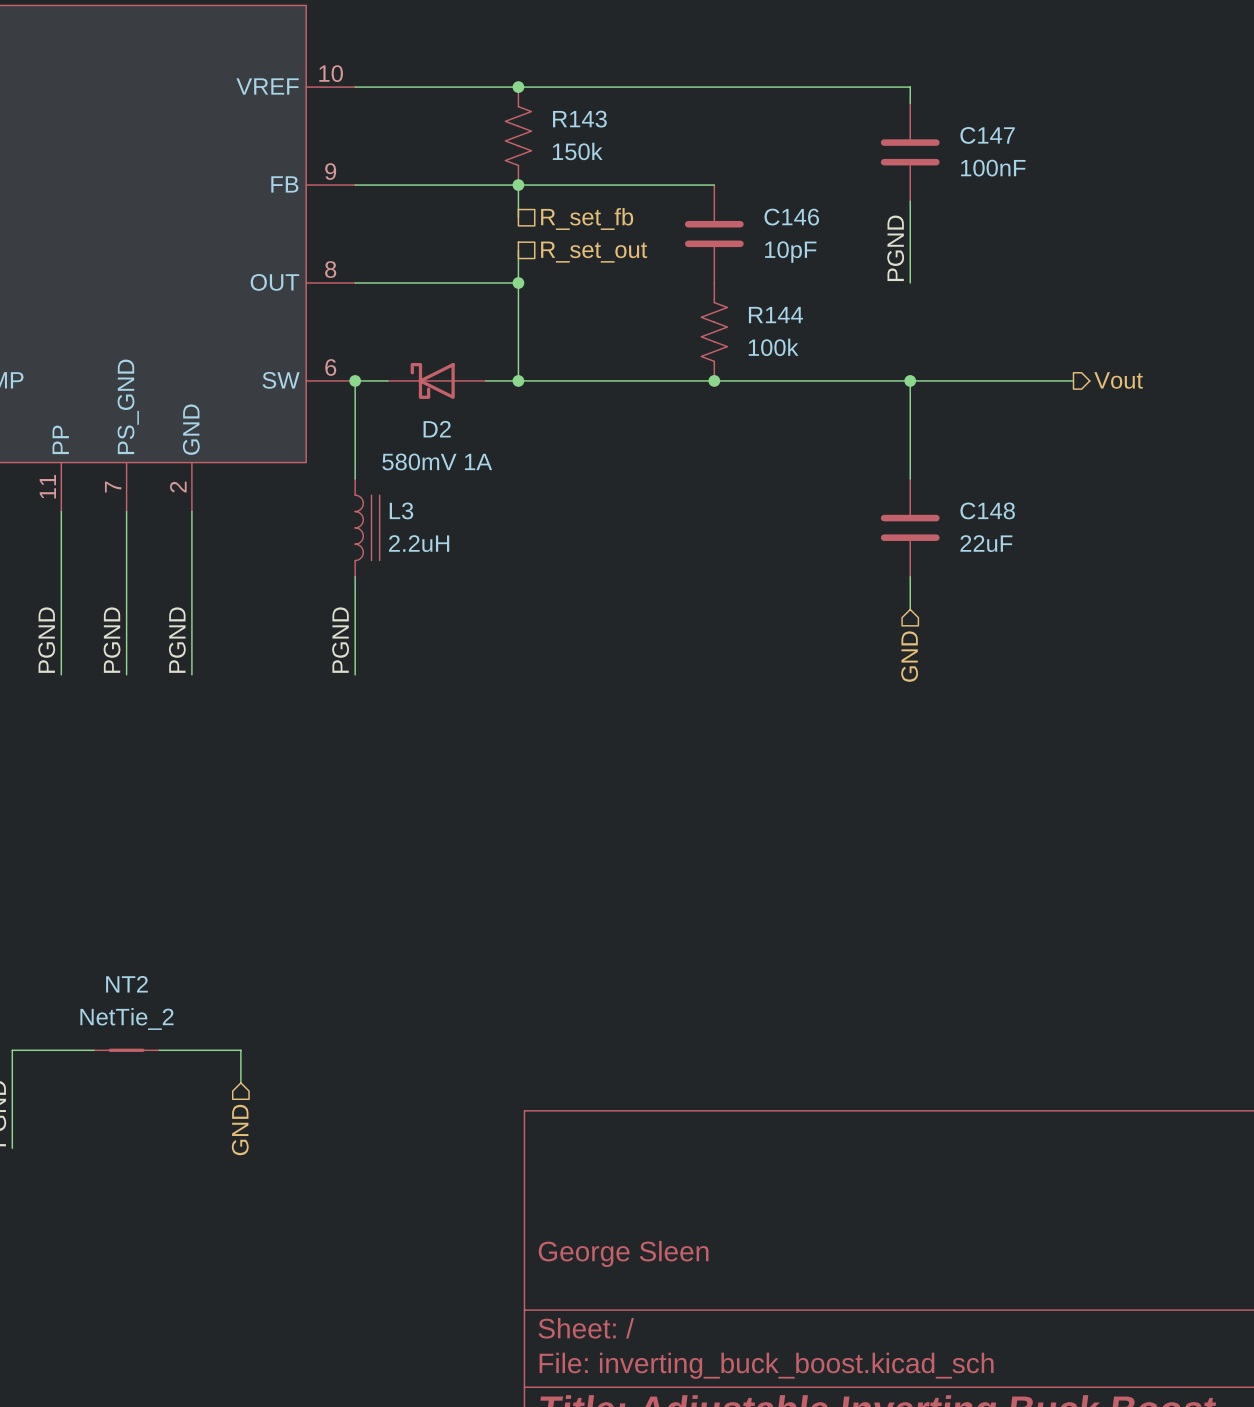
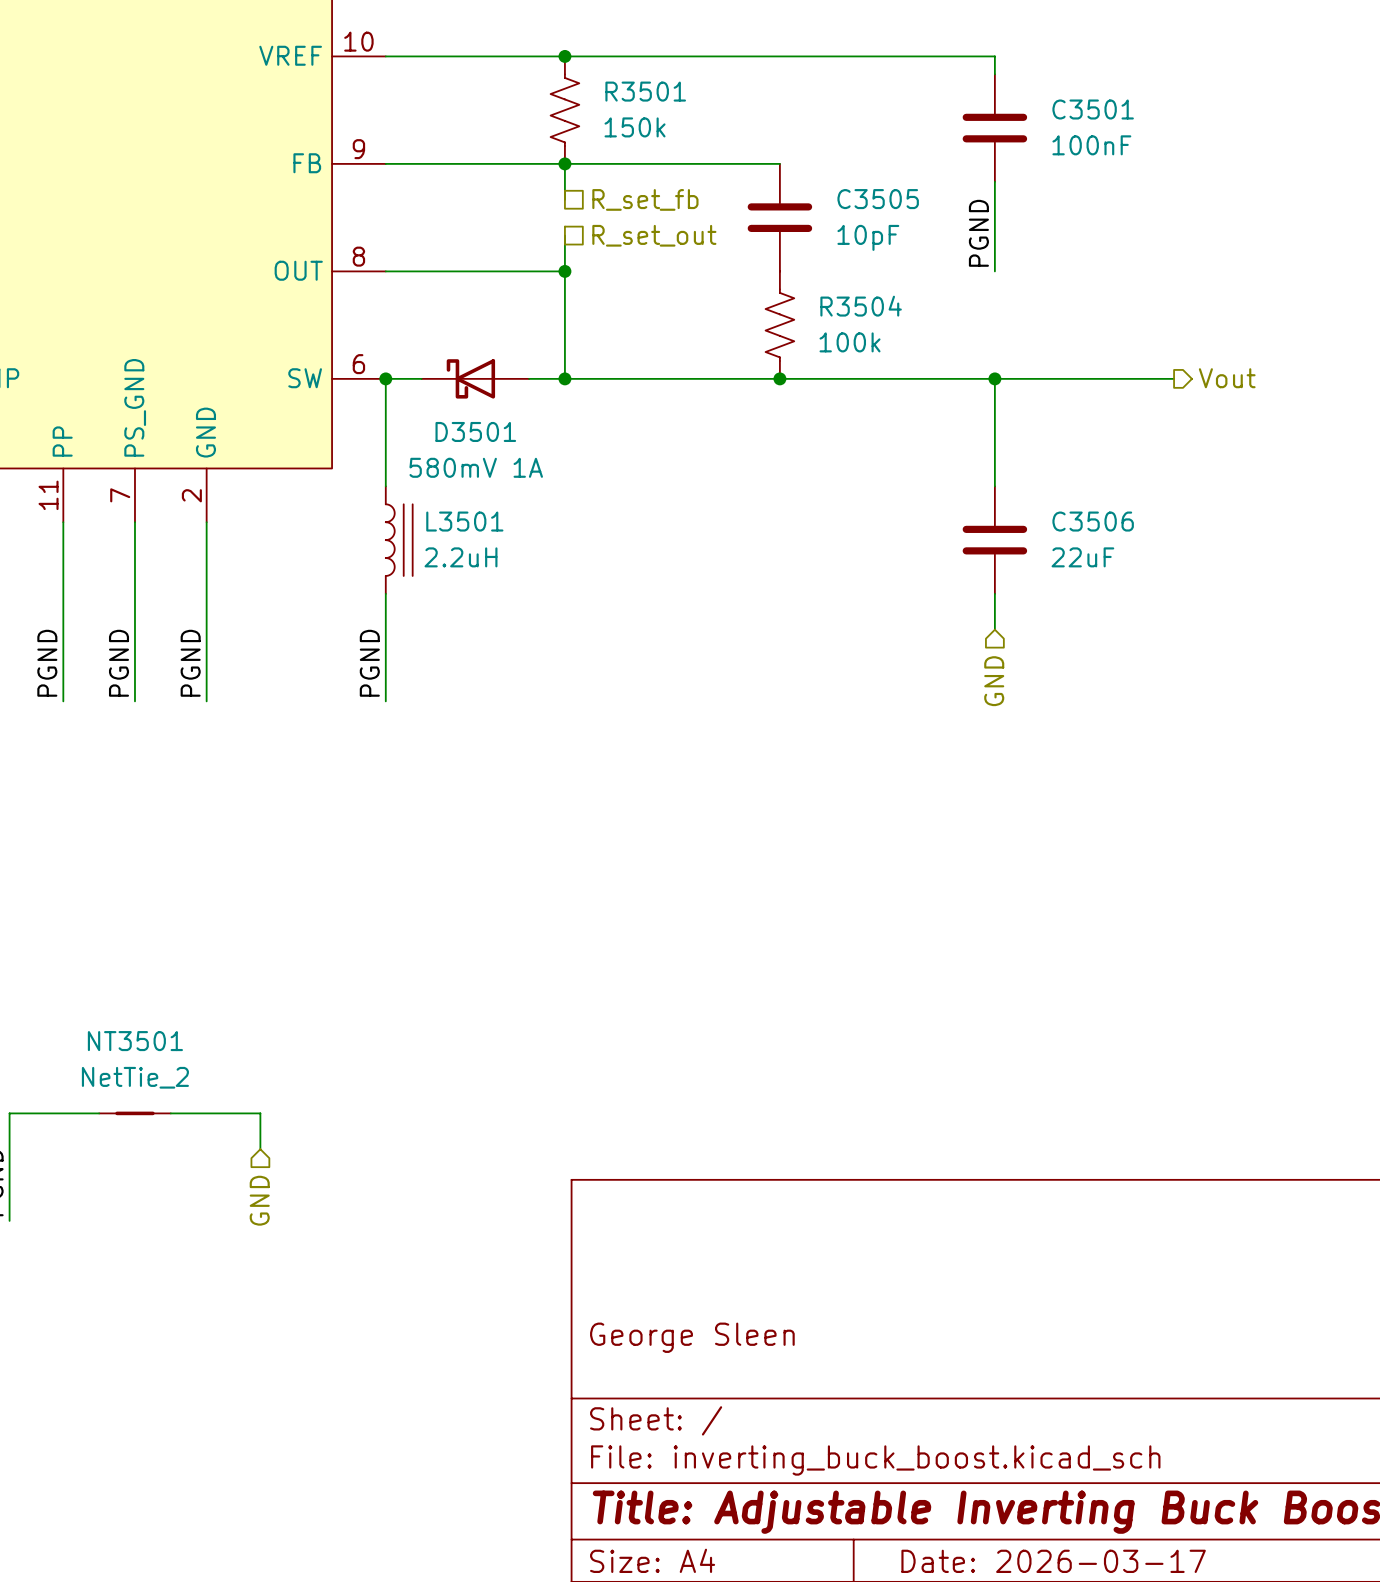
R143 name: R143 (579, 119) -> R3501 (645, 91)
C147 name: C147 (987, 135) -> C3501 (1093, 109)
C146 name: C146 (791, 217) -> C3505 (878, 199)
R144 name: R144 (775, 315) -> R3504 (861, 306)
D2 name: D2 (437, 429) -> D3501 (475, 431)
L3 name: L3 (401, 510) -> L3501 (464, 521)
C148 name: C148 (987, 510) -> C3506 (1093, 521)
NT2 name: NT2 (126, 984) -> NT3501 (135, 1041)

